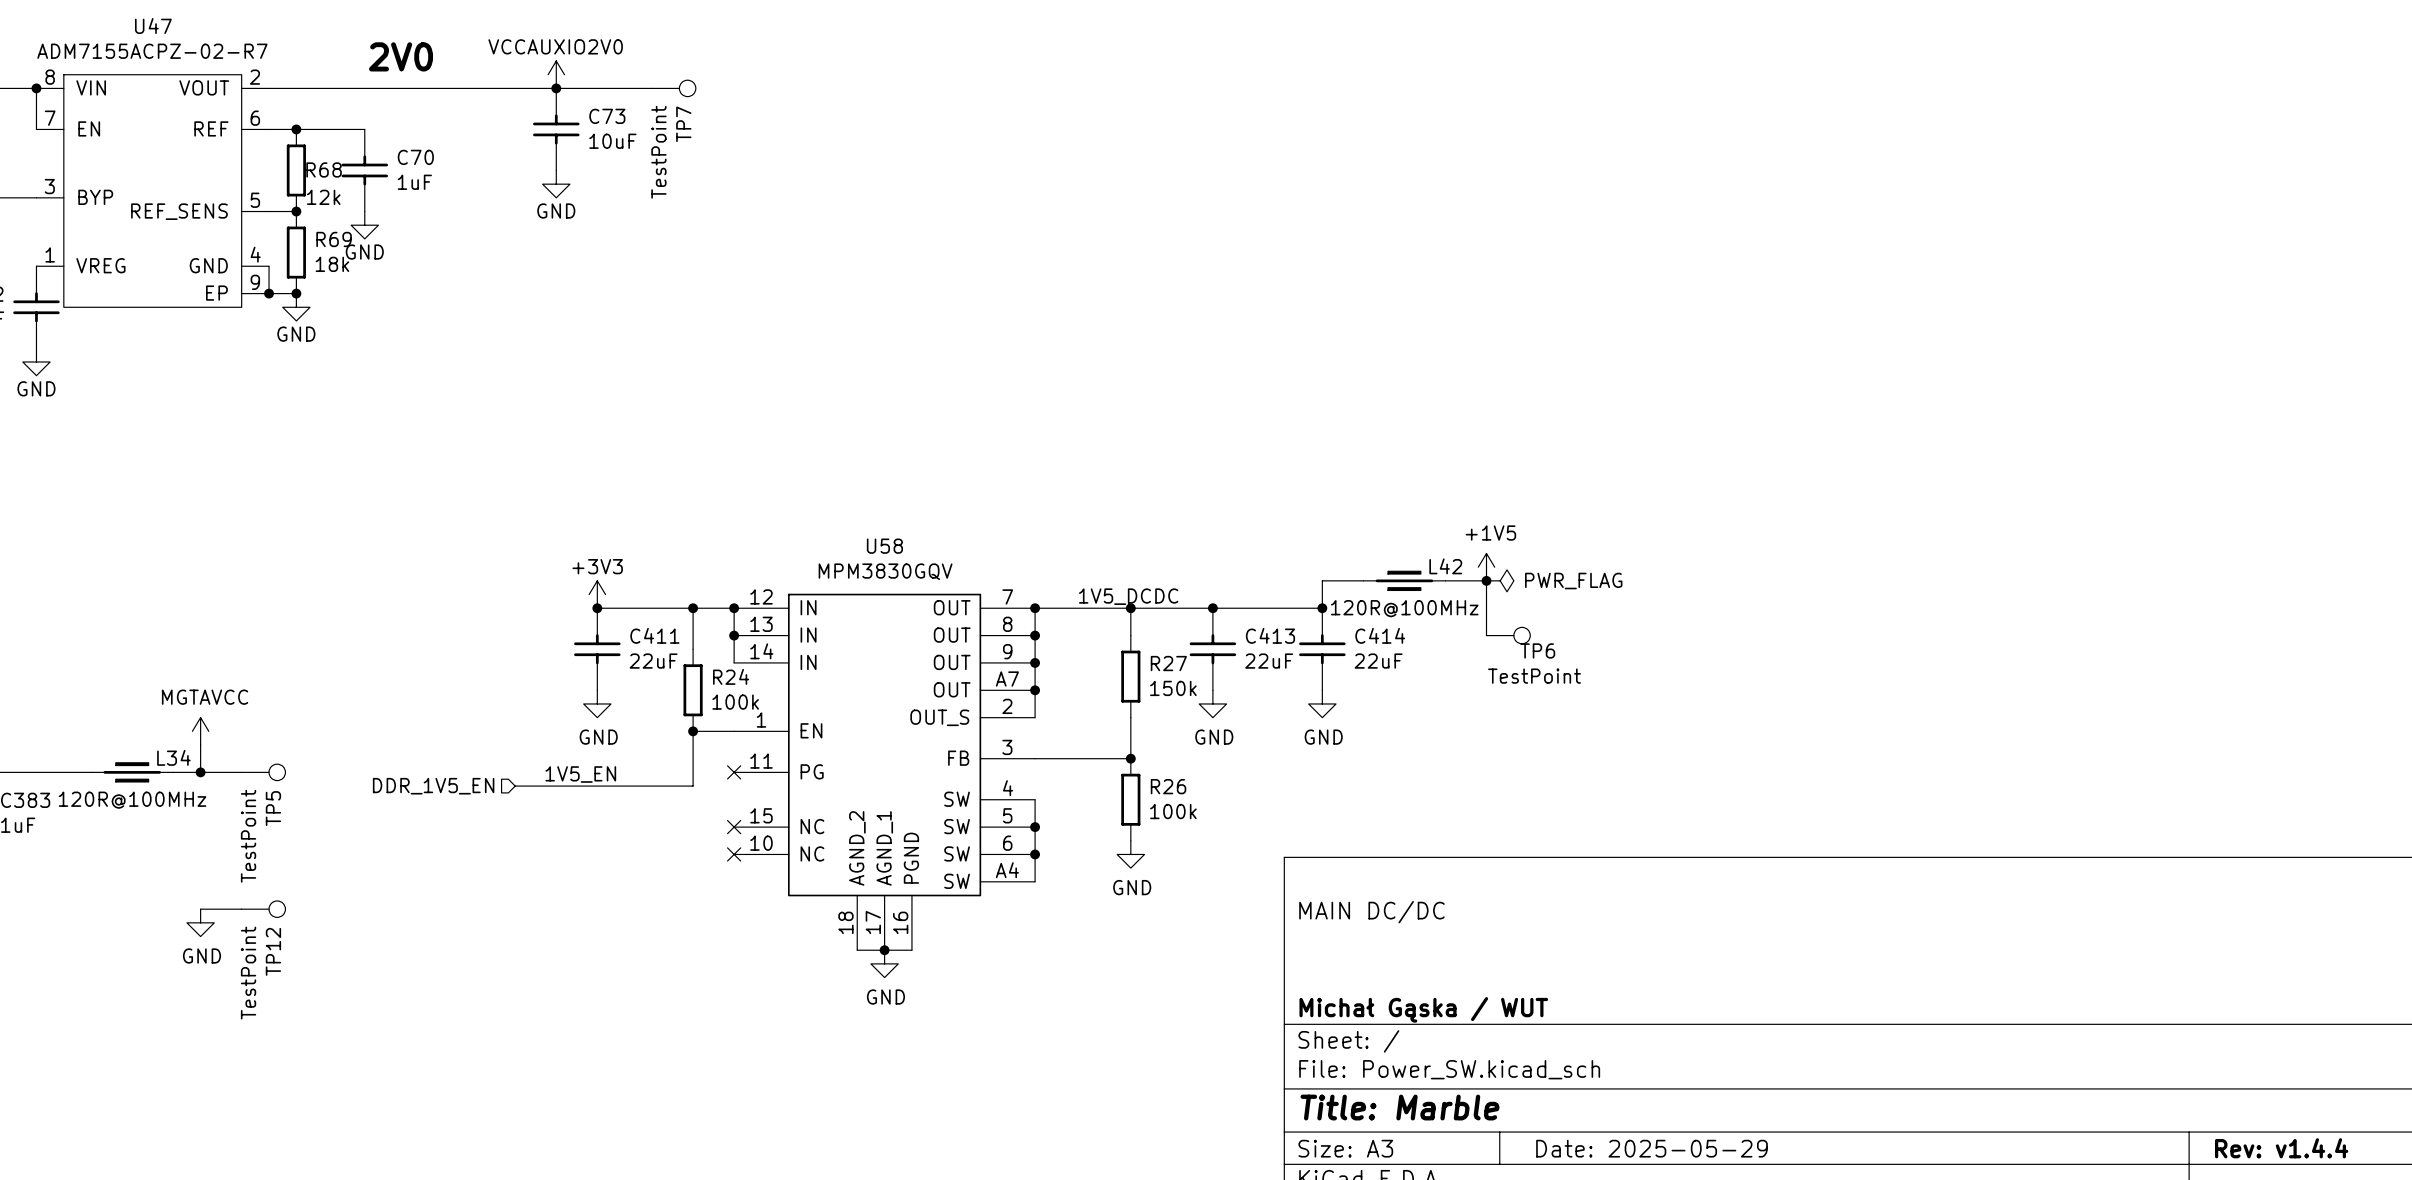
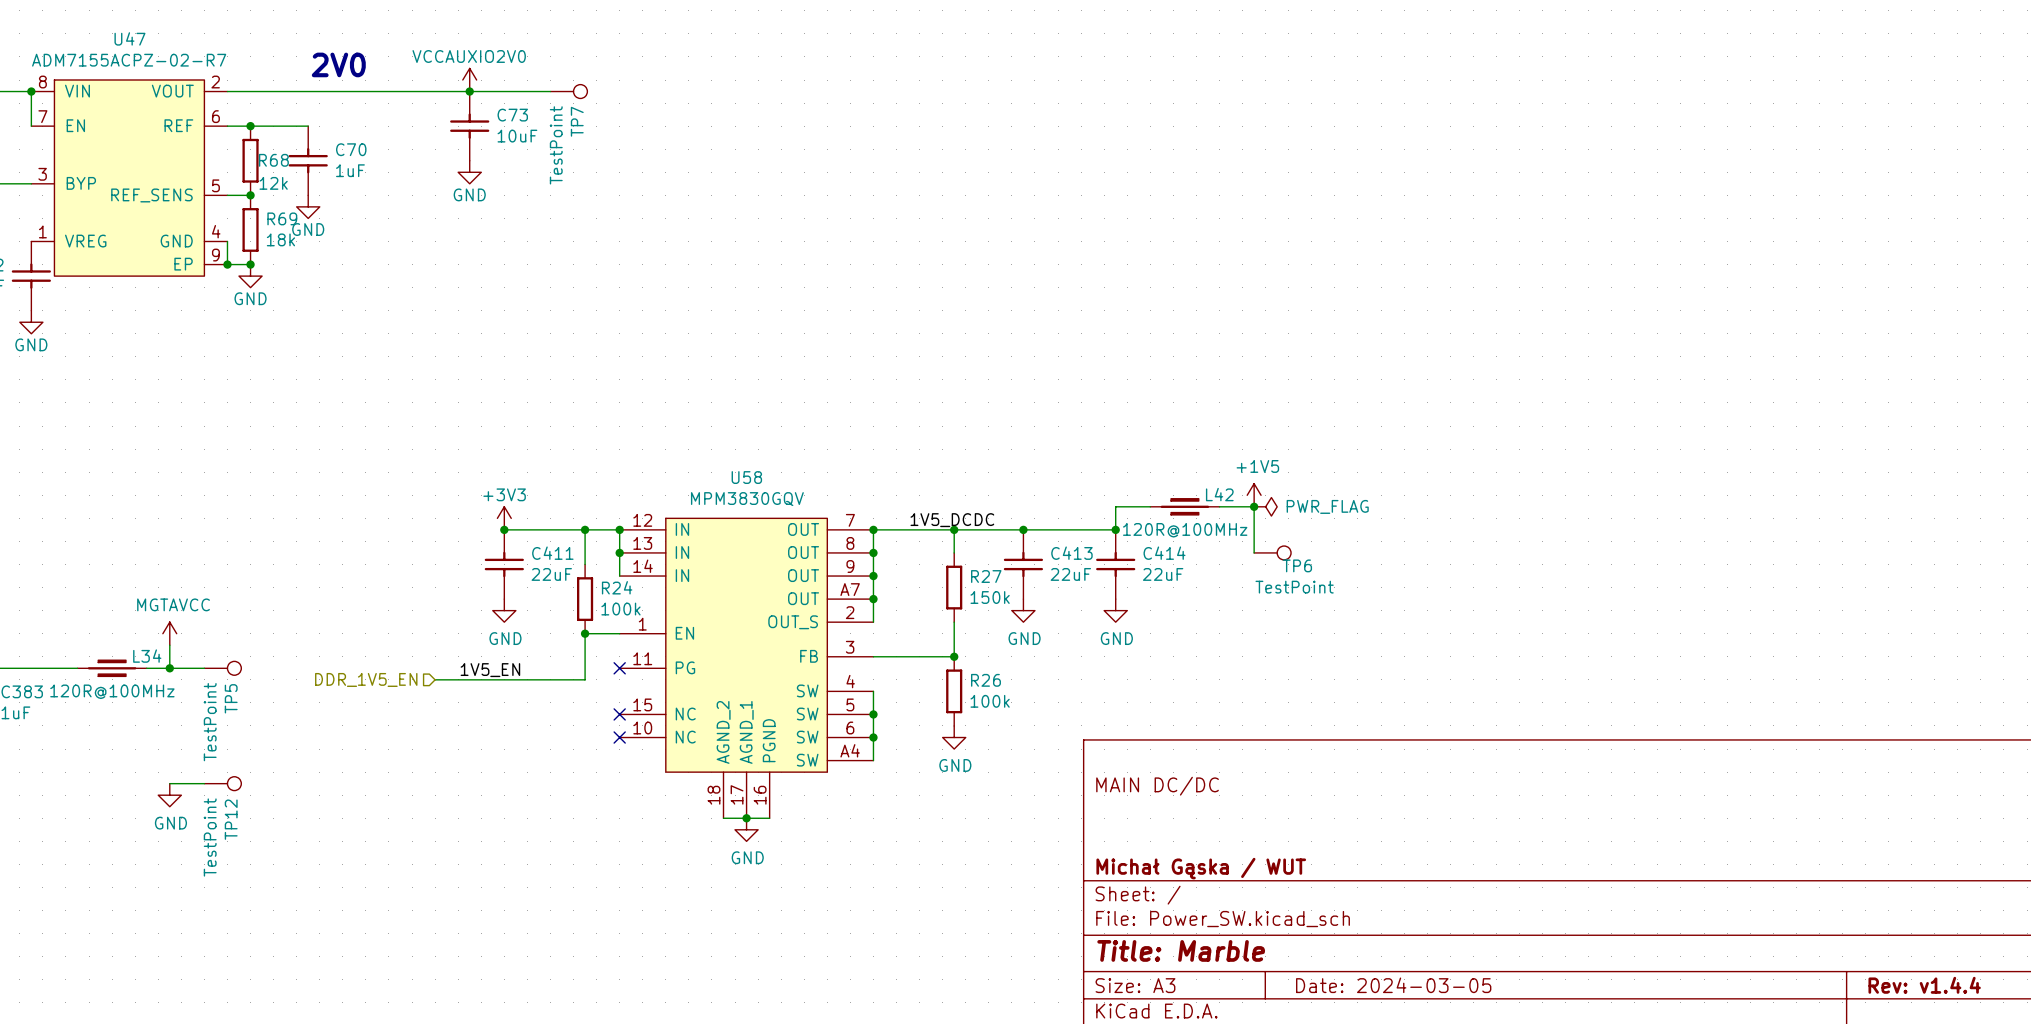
title block: Date: 2025-05-29 (1652, 1148) -> Date: 2024-03-05 (1393, 985)

